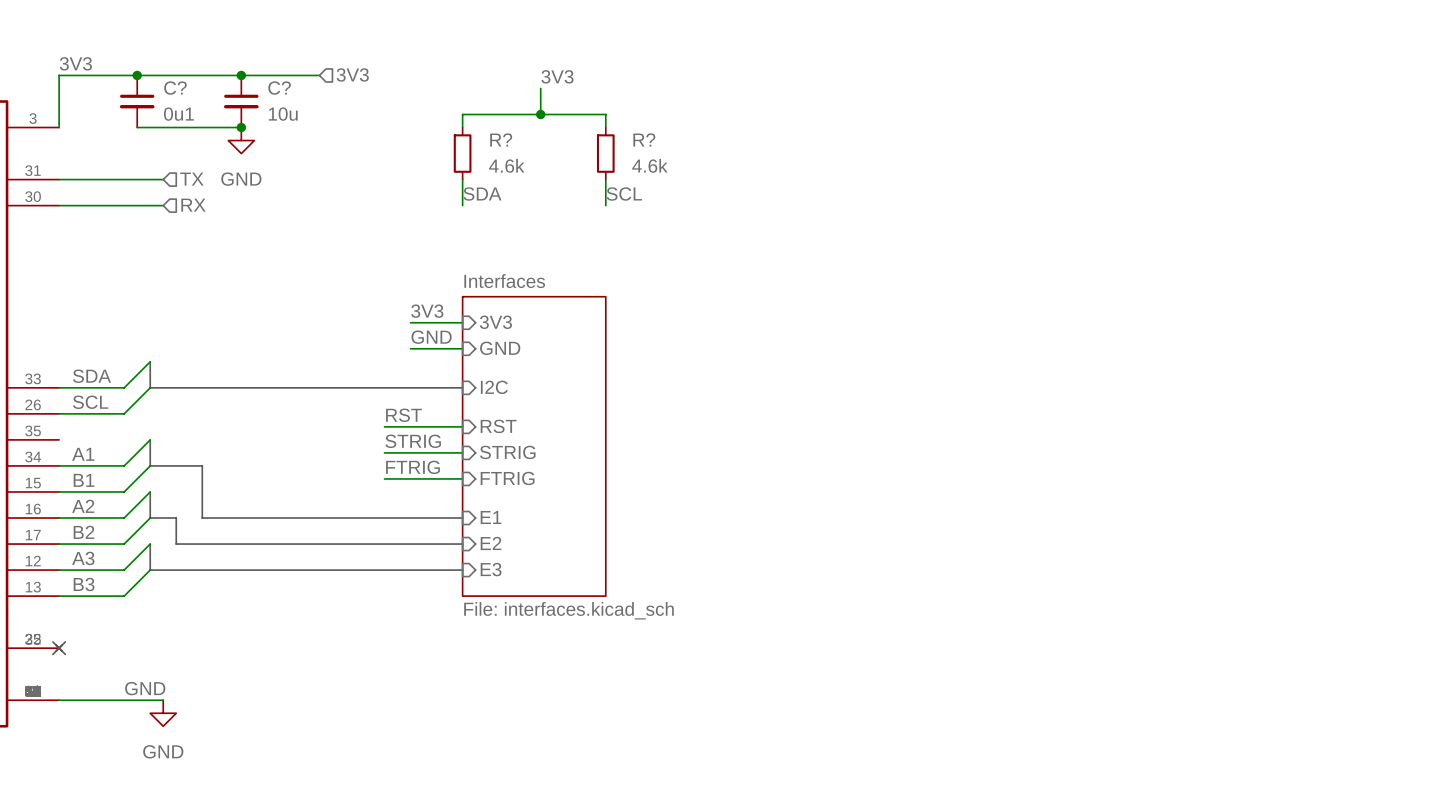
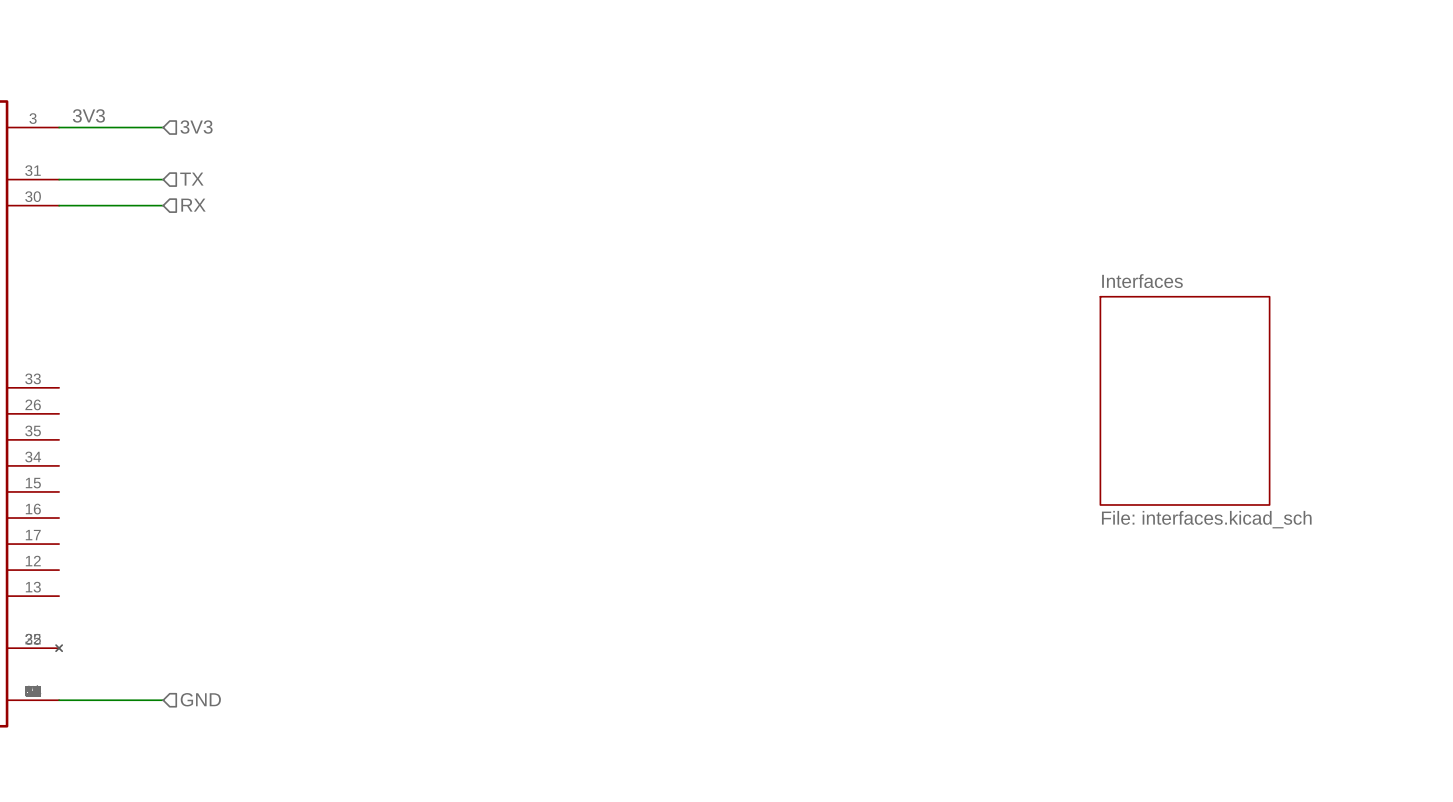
label position: 3V3 (75, 63) -> 3V3 (88, 115)
hierarchical label position: 3V3 (352, 74) -> 3V3 (196, 127)
junction: (137, 75) -> none
junction: (241, 75) -> none
wire: (319, 75) (59, 75) (59, 127) -> (137, 127) (59, 127)
label: 3V3 (557, 76) -> none
wire: (540, 88) (540, 114) -> none
C?: 0u1 (137, 101) -> none
C?: 10u (241, 101) -> none
junction: (540, 114) -> none
wire: (163, 127) (241, 127) -> none
junction: (241, 127) -> none
wire: (462, 127) (462, 114) (605, 114) (605, 127) -> none
power symbol: GND (241, 140) -> none
R?: 4.6k (462, 153) -> none
R?: 4.6k (605, 153) -> none
wire: (462, 179) (462, 205) -> none
wire: (605, 179) (605, 205) -> none
label: SDA (482, 194) -> none
label: SCL (624, 194) -> none
label: 3V3 (427, 311) -> none
wire: (410, 322) (462, 322) -> none
sheet pin: 3V3 (495, 322) -> none
label: GND (431, 337) -> none
wire: (410, 348) (462, 348) -> none
sheet pin: GND (500, 348) -> none
wire: (150, 361) (124, 387) (59, 387) -> none
bus: (150, 361) (150, 387) (462, 387) -> none
label: SDA (91, 376) -> none
wire: (150, 387) (124, 413) (59, 413) -> none
sheet pin: I2C (494, 387) -> none
sheet Interfaces: none -> File: interfaces.kicad_sch (1185, 400)
label: SCL (90, 402) -> none
label: RST (404, 415) -> none
wire: (384, 426) (462, 426) -> none
sheet pin: RST (498, 426) -> none
wire: (150, 439) (124, 465) (59, 465) -> none
bus: (150, 439) (150, 465) (202, 465) (202, 518) (462, 518) -> none
label: STRIG (413, 441) -> none
sheet Interfaces: File: interfaces.kicad_sch (534, 446) -> none
wire: (384, 452) (462, 452) -> none
sheet pin: STRIG (507, 452) -> none
label: A1 (83, 454) -> none
wire: (150, 465) (124, 491) (59, 491) -> none
label: FTRIG (412, 467) -> none
wire: (384, 478) (462, 478) -> none
sheet pin: FTRIG (507, 478) -> none
label: B1 (84, 480) -> none
wire: (150, 491) (124, 518) (59, 518) -> none
bus: (150, 491) (150, 518) (176, 518) (176, 544) (462, 544) -> none
label: A2 (83, 506) -> none
sheet pin: E1 (491, 517) -> none
wire: (150, 518) (124, 544) (59, 544) -> none
label: B2 (84, 532) -> none
sheet pin: E2 (491, 543) -> none
wire: (150, 544) (124, 570) (59, 570) -> none
bus: (150, 544) (150, 570) (462, 570) -> none
label: A3 (83, 558) -> none
sheet pin: E3 (491, 569) -> none
wire: (150, 570) (124, 596) (59, 596) -> none
label: B3 (84, 584) -> none
no-connect mark: (59, 648) -> none
label: GND (145, 688) -> none
hierarchical label: none -> GND (200, 699)
power symbol: GND (163, 713) -> none

